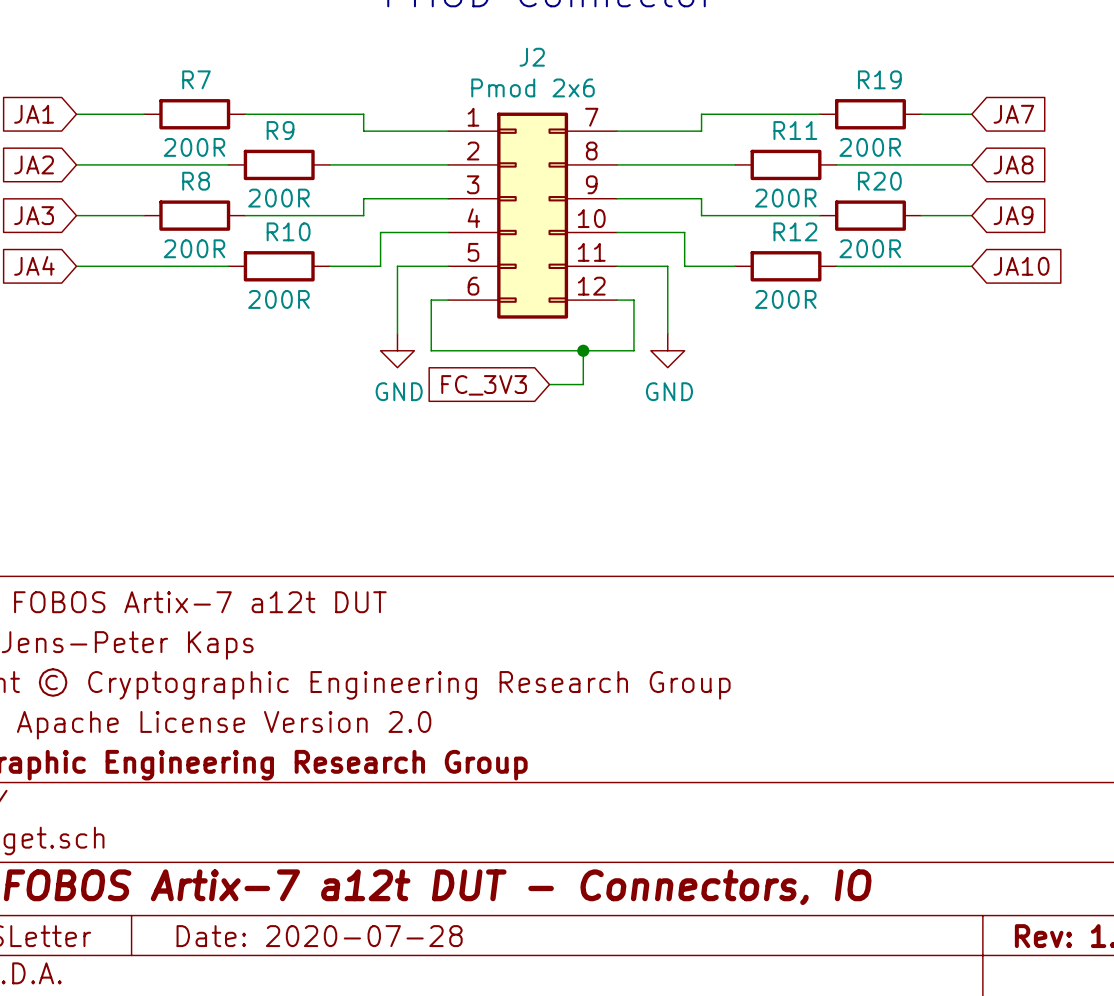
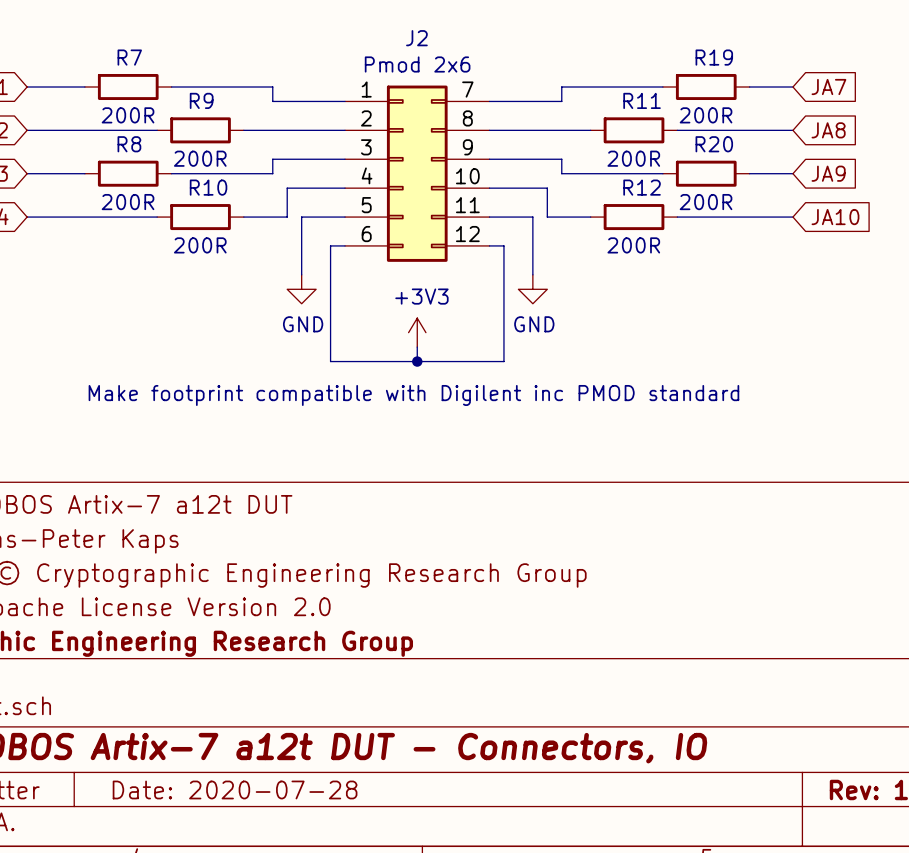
wire: (431, 350) (633, 350) -> (330, 289) (330, 361) (503, 361) (503, 289)
wire: (583, 350) (583, 384) (549, 384) -> none
junction: (583, 350) -> none
global label: FC_3V3 (484, 385) -> none
power symbol: none -> +3V3 (417, 332)
wire: none -> (417, 347) (417, 361)
junction: none -> (417, 361)
text: none -> Make footprint compatible with Digilent inc PMOD standard (413, 395)

